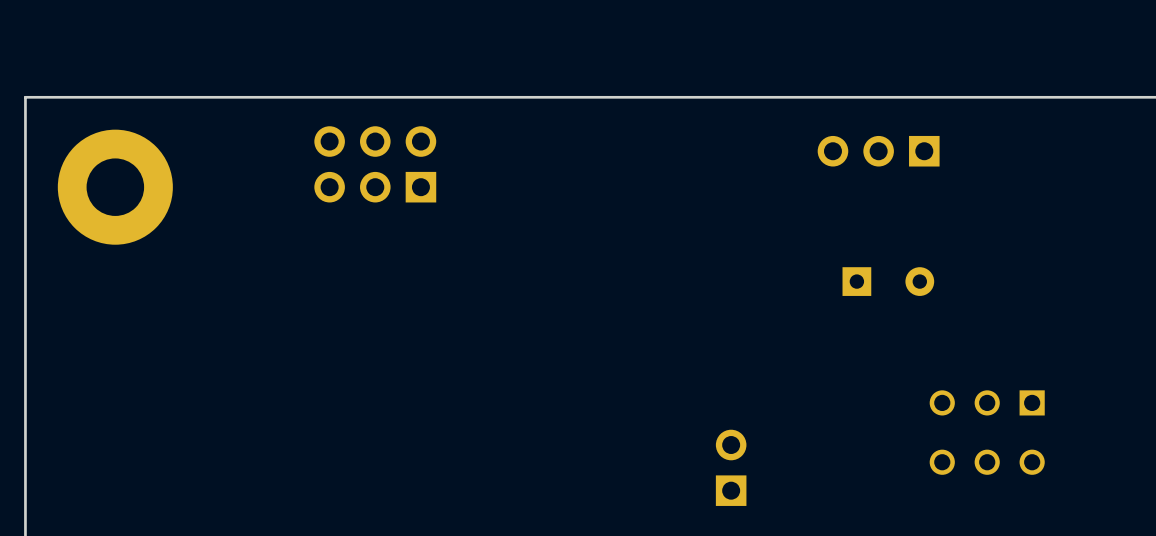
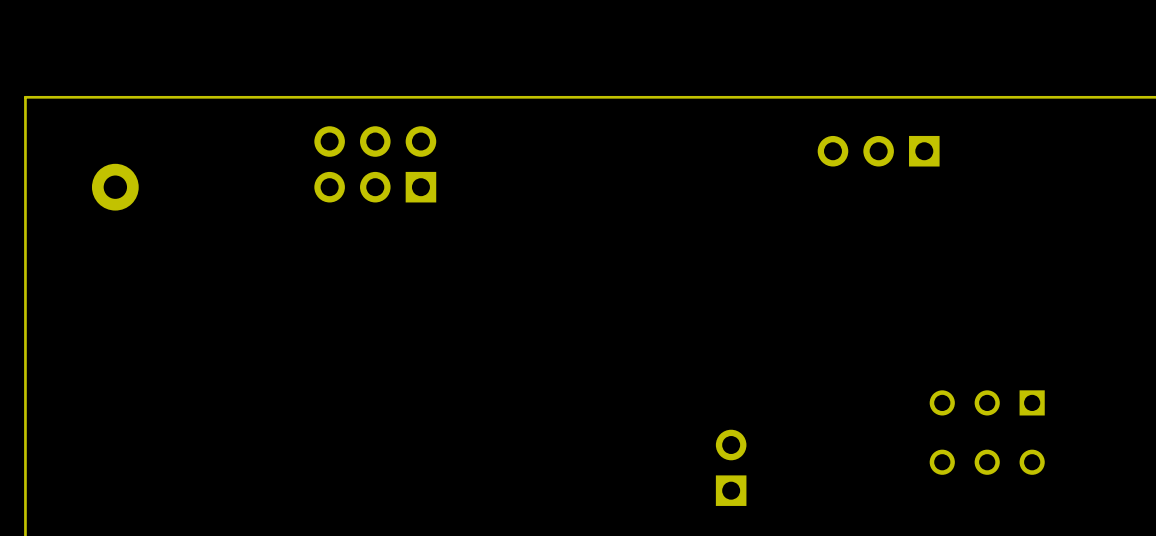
part footprint: [57, 129, 173, 245] -> [91, 163, 139, 211]
part: (888, 281) -> none

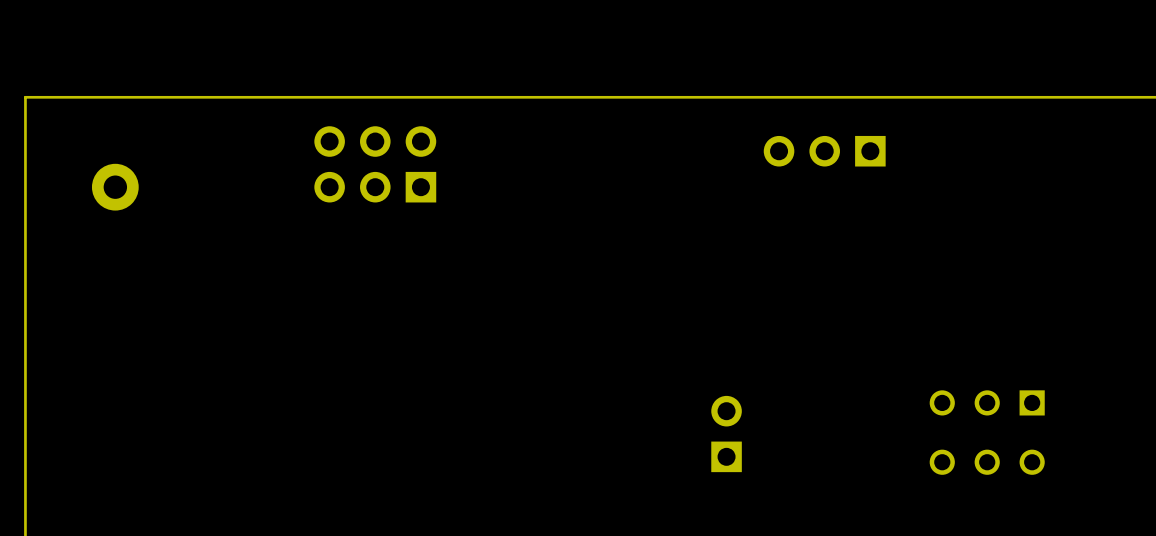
part position: (878, 151) -> (824, 151)
part position: (731, 467) -> (726, 434)

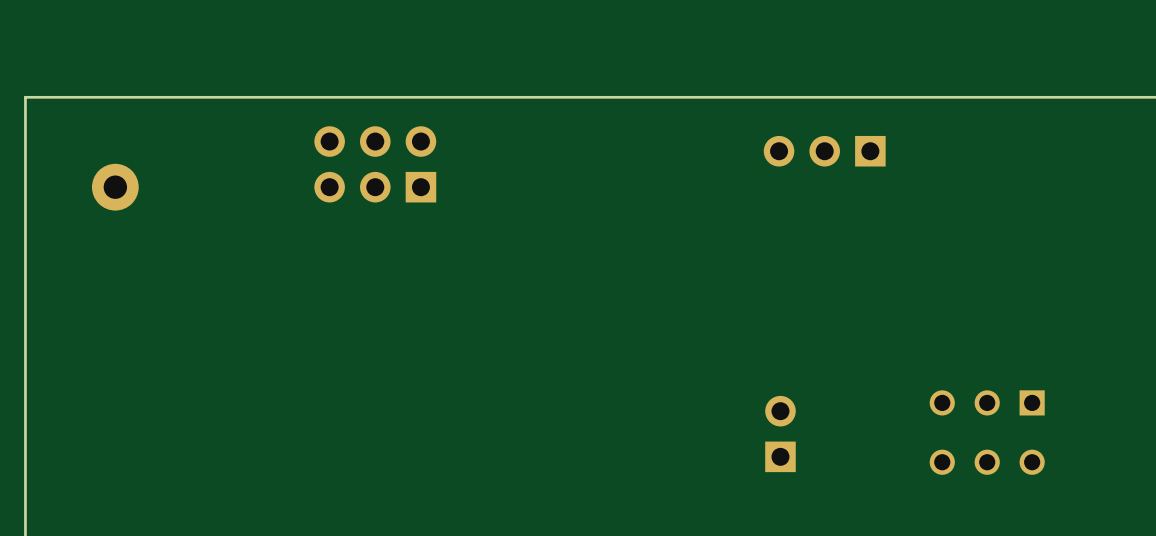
part position: (726, 434) -> (780, 434)

